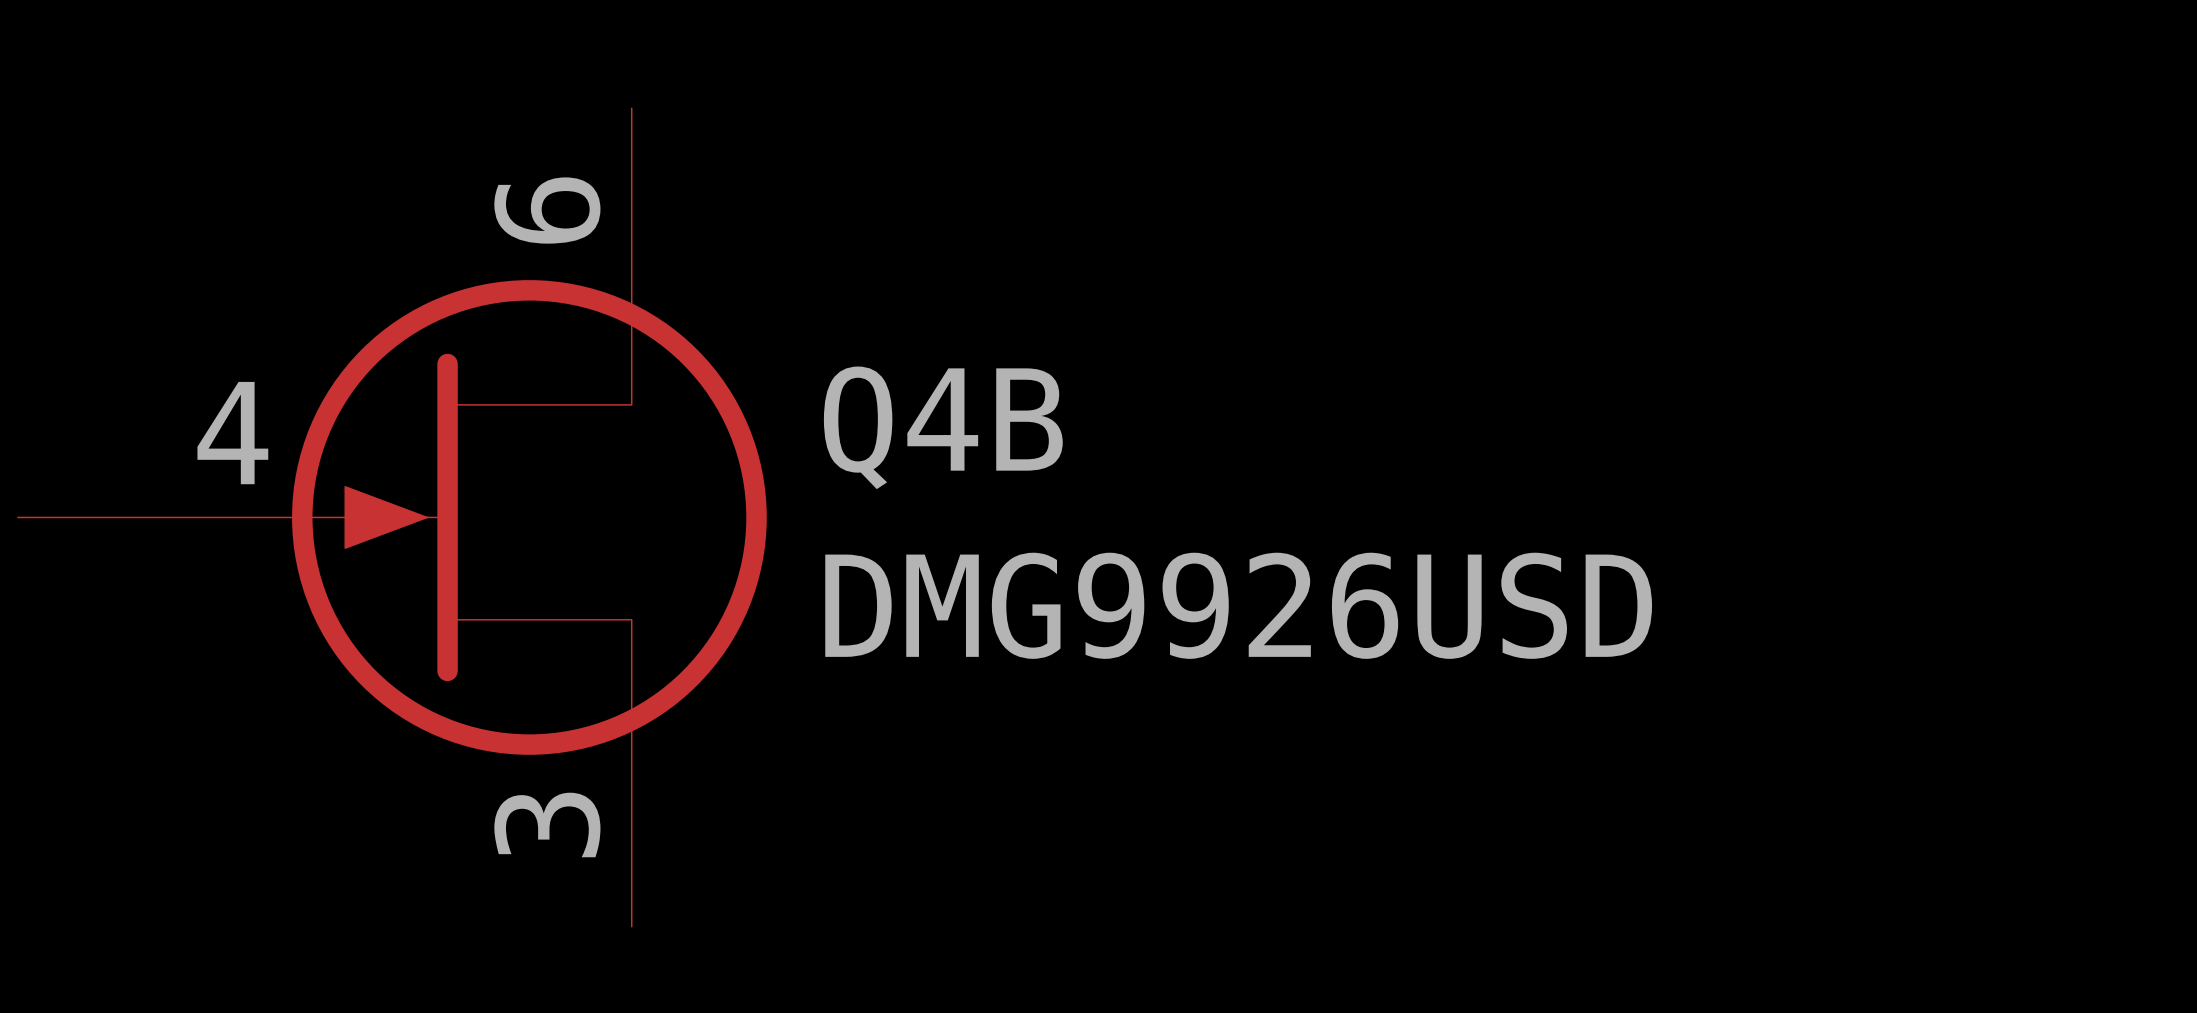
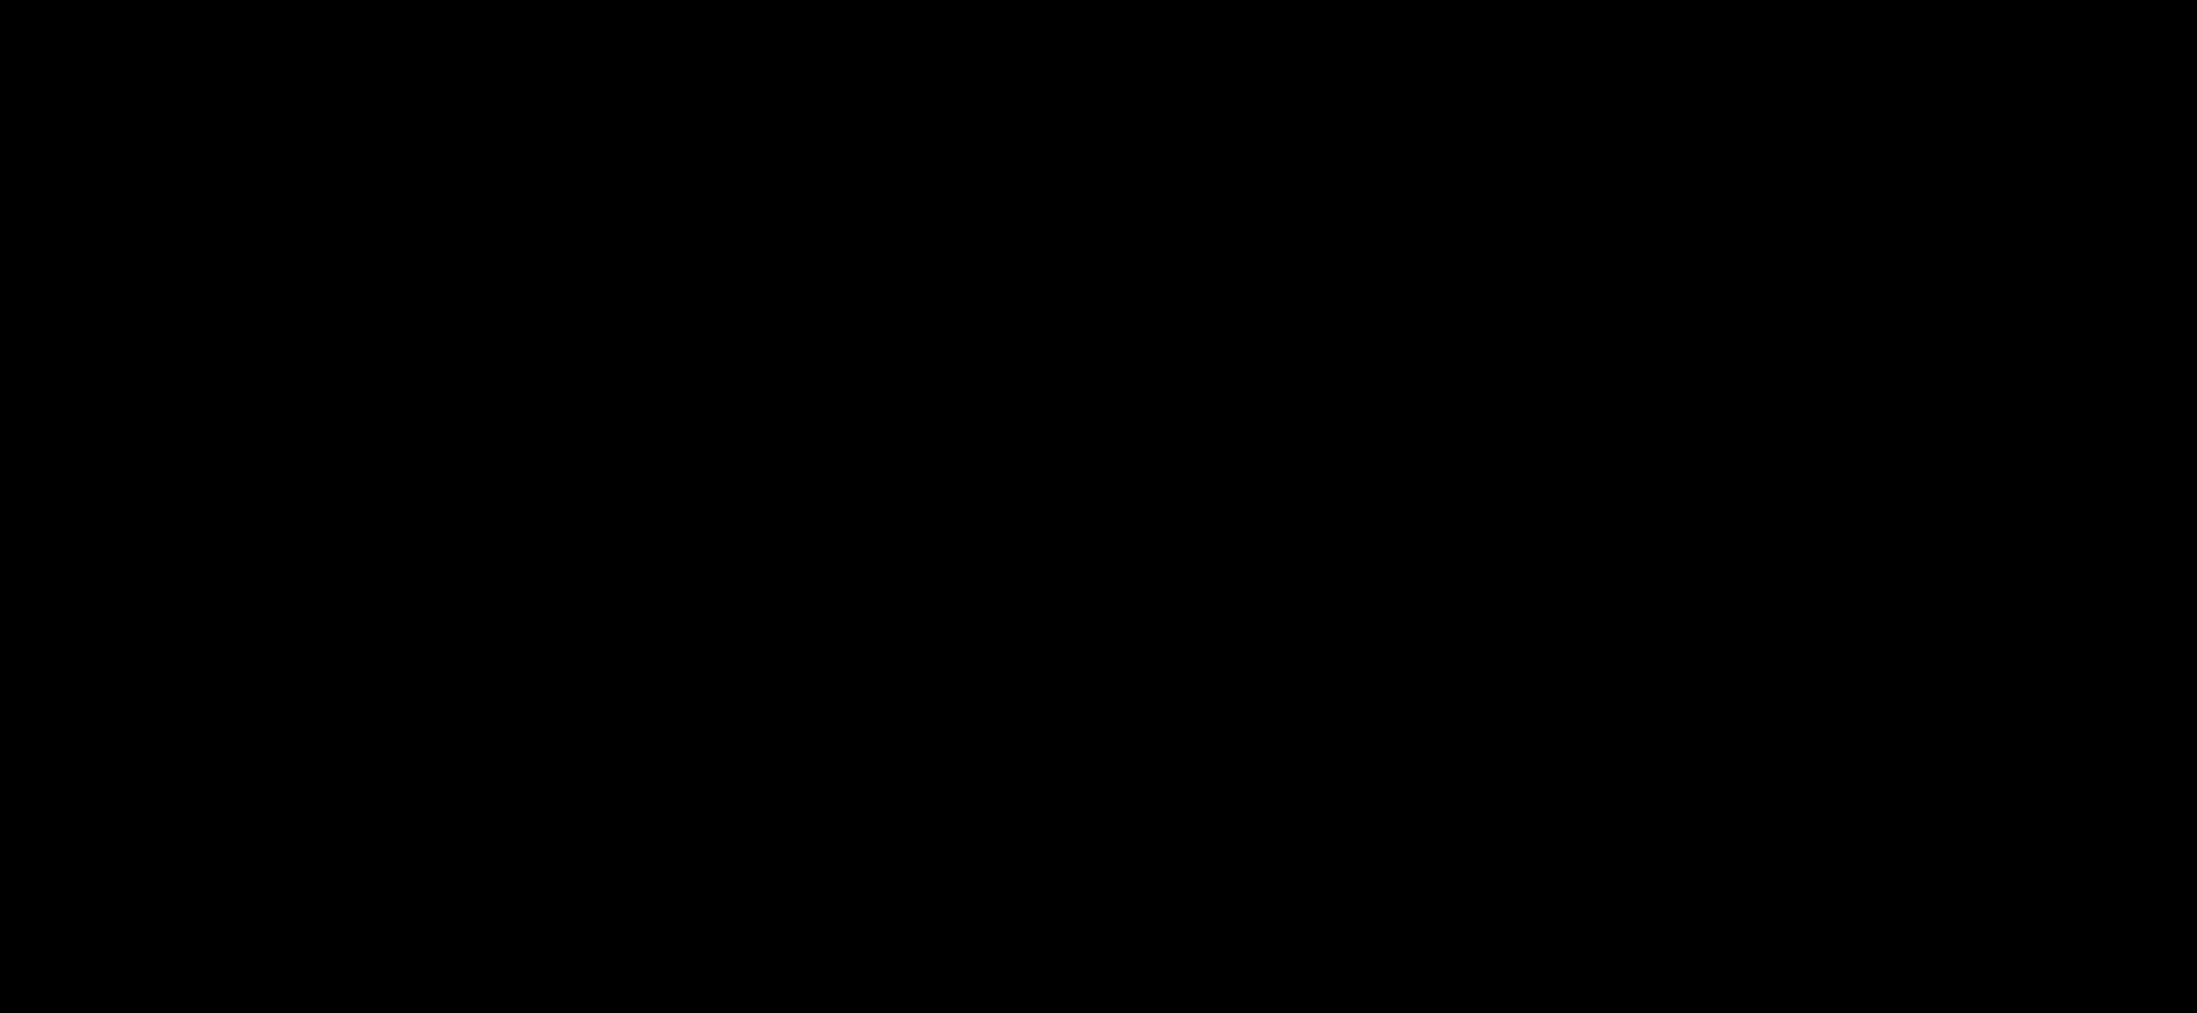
Q4B: DMG9926USD (392, 517) -> none

